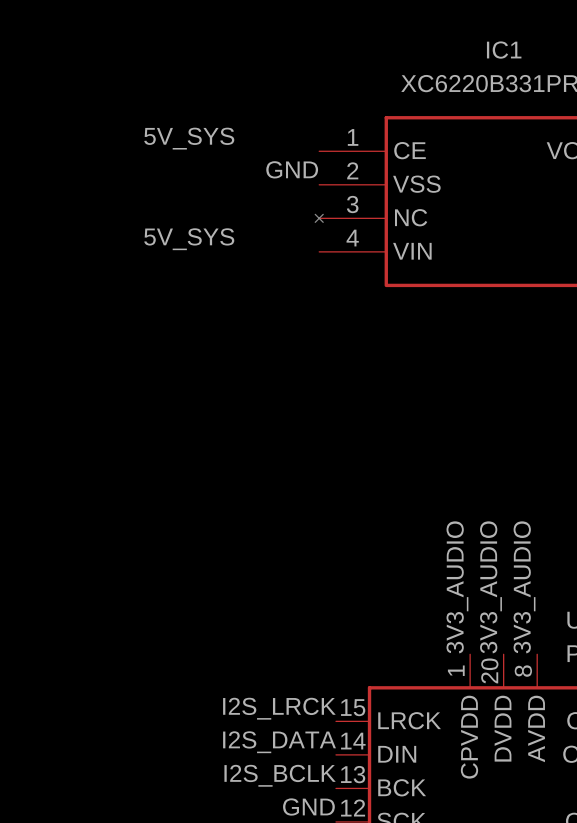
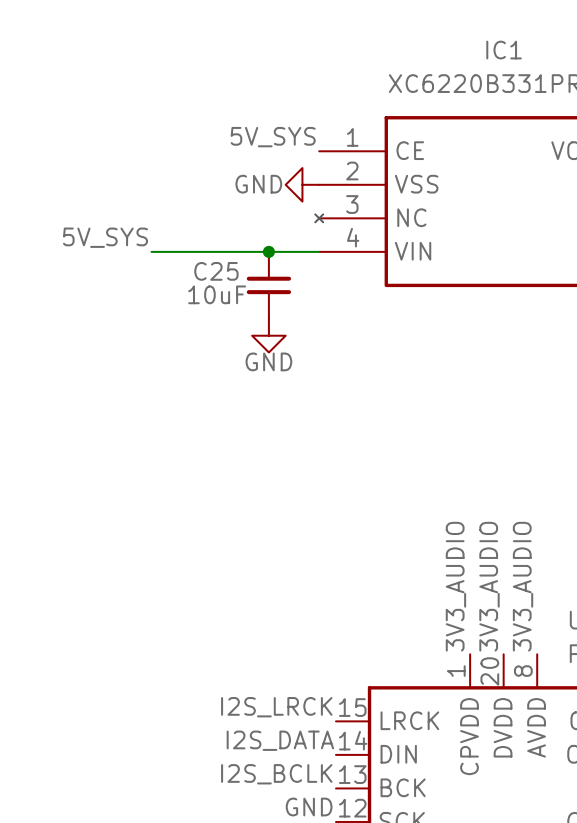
label position: 5V_SYS (189, 138) -> 5V_SYS (273, 137)
label: GND (292, 169) -> none
power symbol: none -> GND (302, 184)
label position: 5V_SYS (189, 239) -> 5V_SYS (105, 237)
wire: none -> (151, 251) (319, 251)
junction: none -> (268, 251)
C25: none -> 10uF (268, 285)
power symbol: none -> GND (268, 335)

